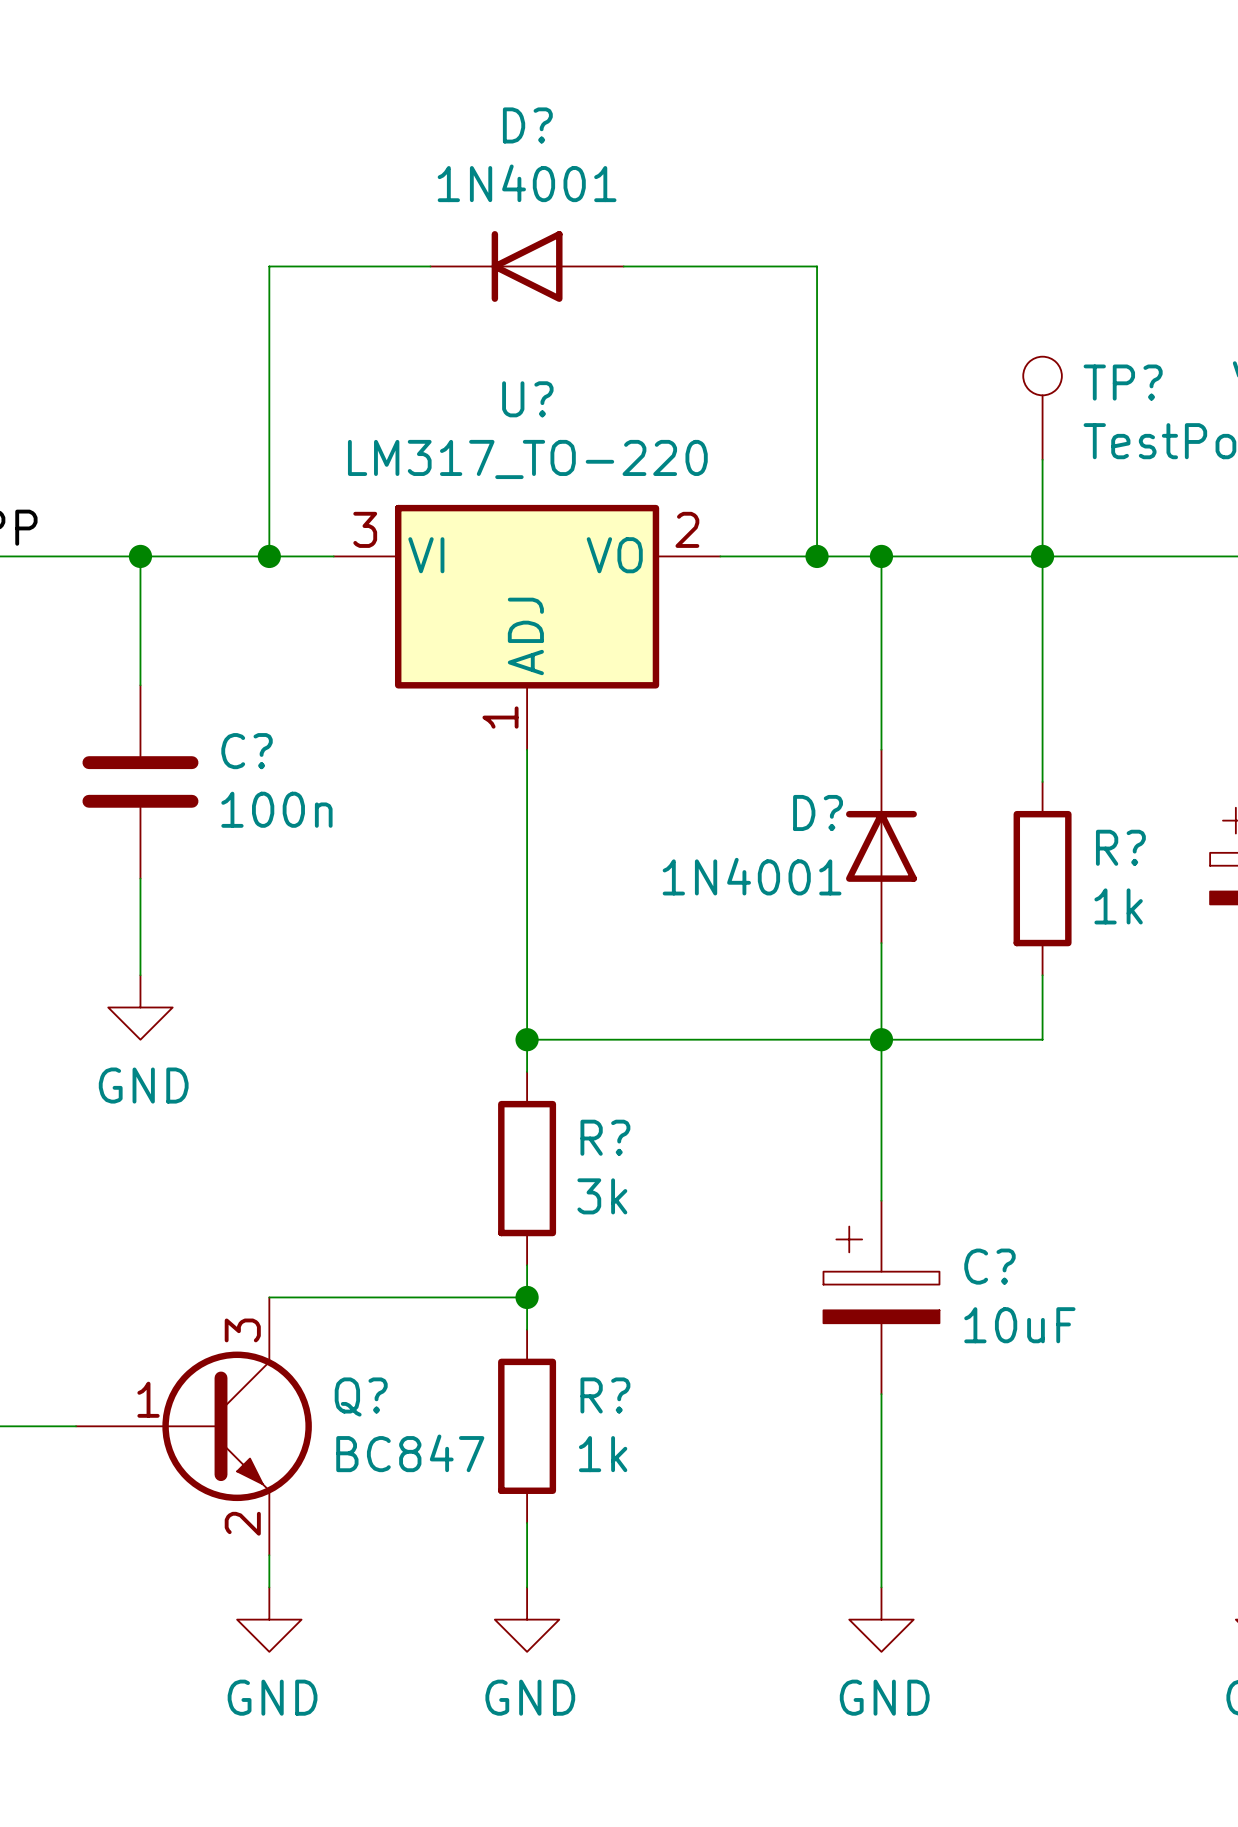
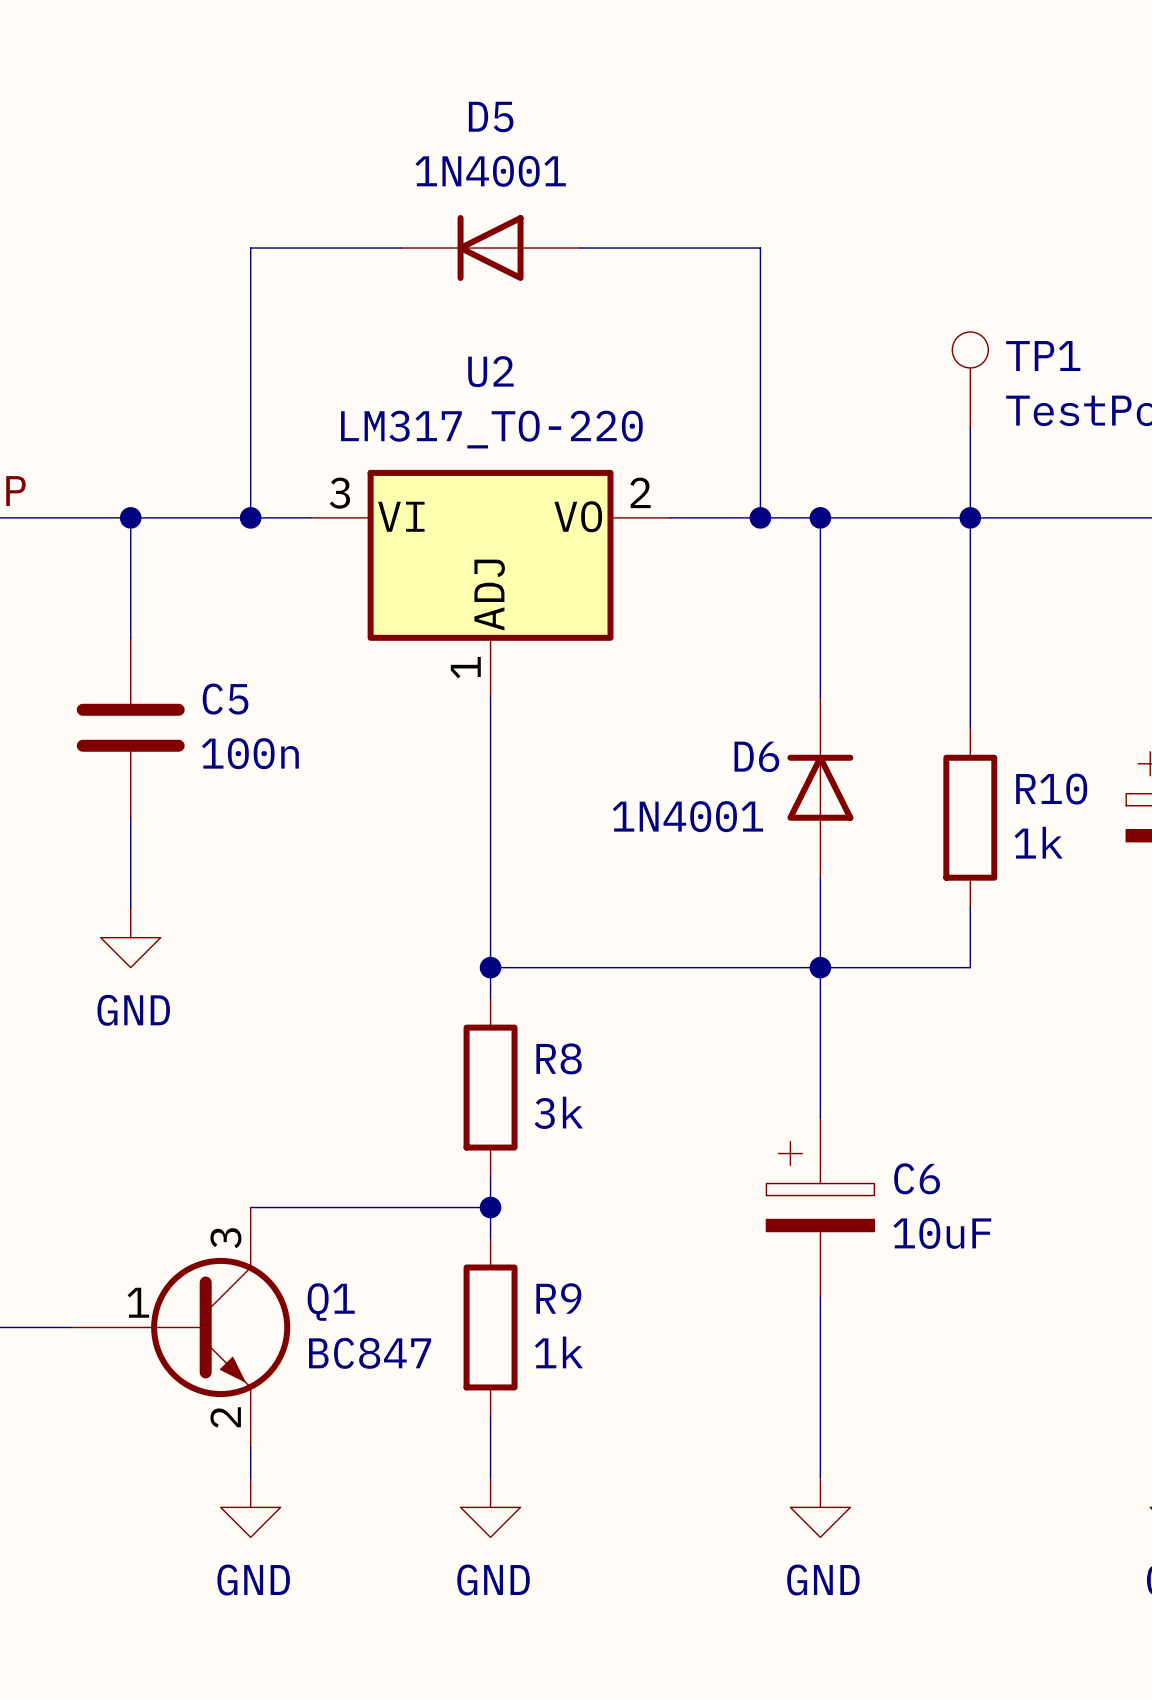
D? name: D? (527, 125) -> D5 (491, 117)
TP? name: TP? (1123, 382) -> TP1 (1043, 356)
U? name: U? (527, 399) -> U2 (490, 371)
C? name: C? (247, 751) -> C5 (225, 699)
D? name: D? (818, 812) -> D6 (756, 756)
R? name: R? (1120, 847) -> R10 (1051, 789)
R? name: R? (605, 1137) -> R8 (559, 1058)
C? name: C? (989, 1266) -> C6 (917, 1178)
R? name: R? (605, 1395) -> R9 (558, 1298)
Q? name: Q? (361, 1397) -> Q1 (331, 1302)

